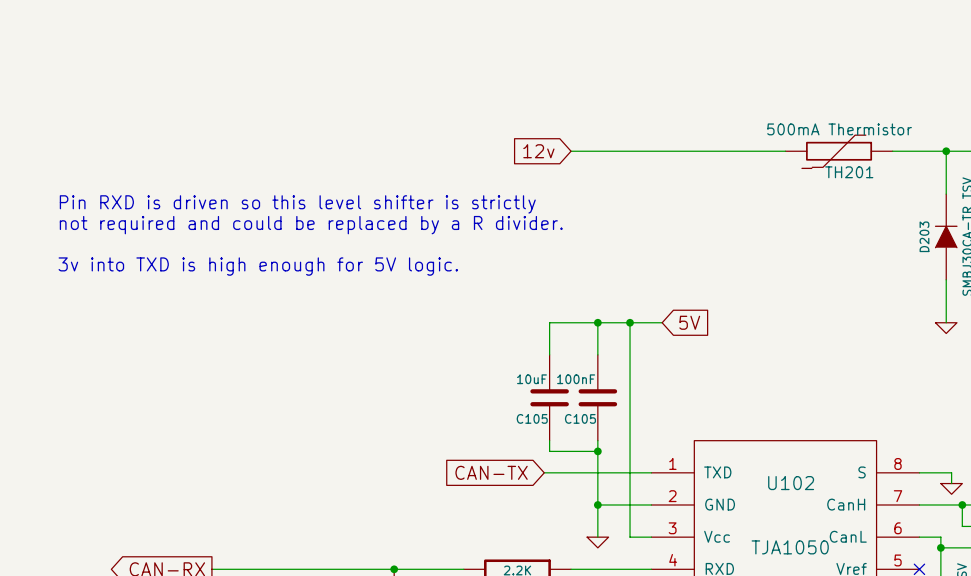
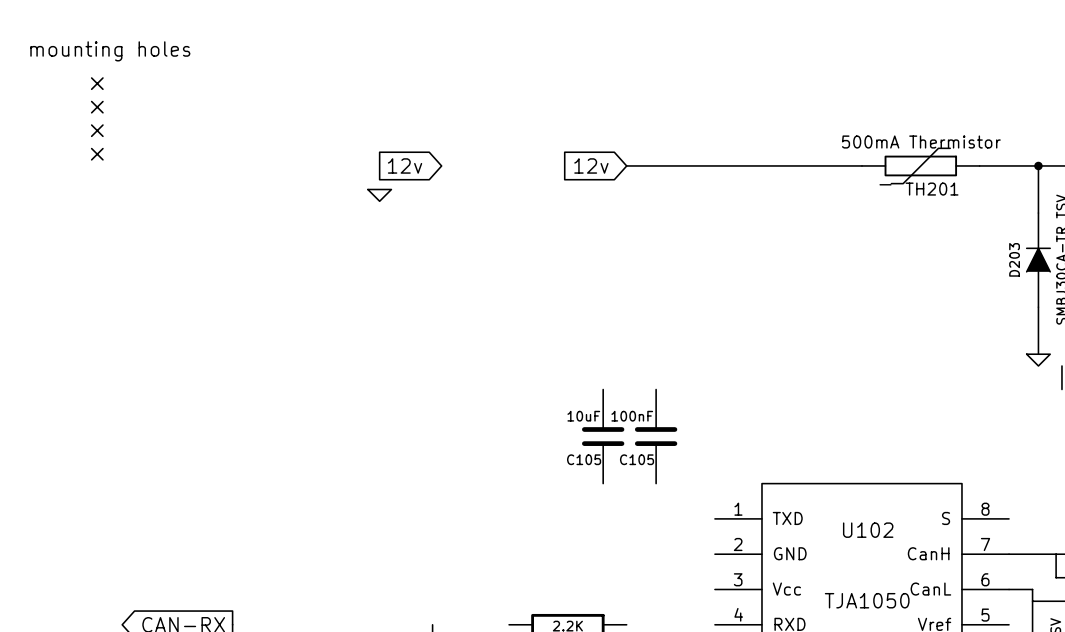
text: none -> mounting holes (110, 51)
no-connect mark: none -> (97, 83)
no-connect mark: none -> (97, 107)
no-connect mark: none -> (97, 130)
no-connect mark: none -> (97, 154)
global label: none -> 12v (405, 165)
power symbol: none -> (379, 195)
text: Pin RXD is driven so this level shifter is strictly (297, 204) -> none
text: not required and could be replaced by a R divider. (311, 225) -> none
text: 3v into TXD is high enough for 5V logic. (258, 266) -> none
wire: (597, 322) (597, 354) -> none
junction: (597, 322) -> none
wire: (630, 322) (630, 537) (651, 537) -> none
junction: (630, 322) -> none
wire: (662, 322) (549, 322) (549, 354) -> none
global label: 5V (689, 322) -> none
wire: none -> (1061, 365) (1061, 389)
wire: (549, 440) (549, 451) (597, 451) -> none
wire: (597, 440) (597, 537) -> none
junction: (597, 451) -> none
global label: CAN-TX (491, 472) -> none
wire: (544, 472) (651, 472) -> none
wire: (919, 472) (951, 472) (951, 483) -> none
power symbol: (951, 488) -> none
wire: (597, 504) (651, 504) -> none
junction: (597, 504) -> none
junction: (962, 504) -> none
power symbol: (597, 542) -> none
junction: (940, 547) -> none
wire: (211, 569) (463, 569) -> none
junction: (394, 569) -> none
wire: (571, 569) (651, 569) -> none
no-connect mark: (919, 569) -> none

